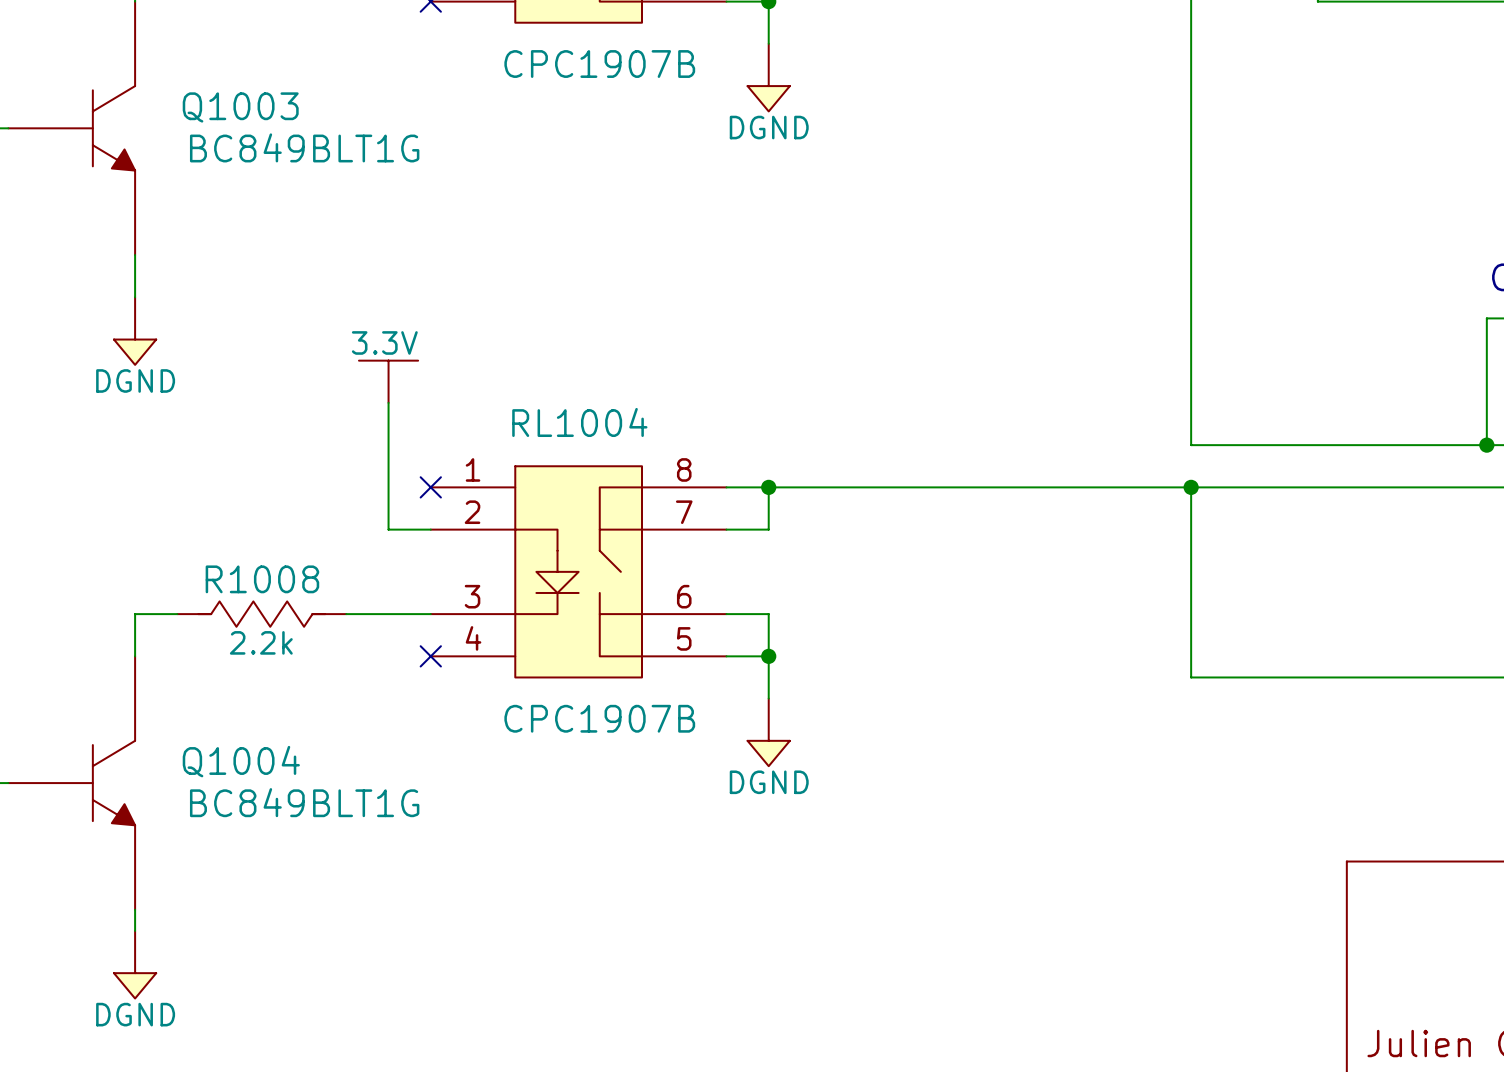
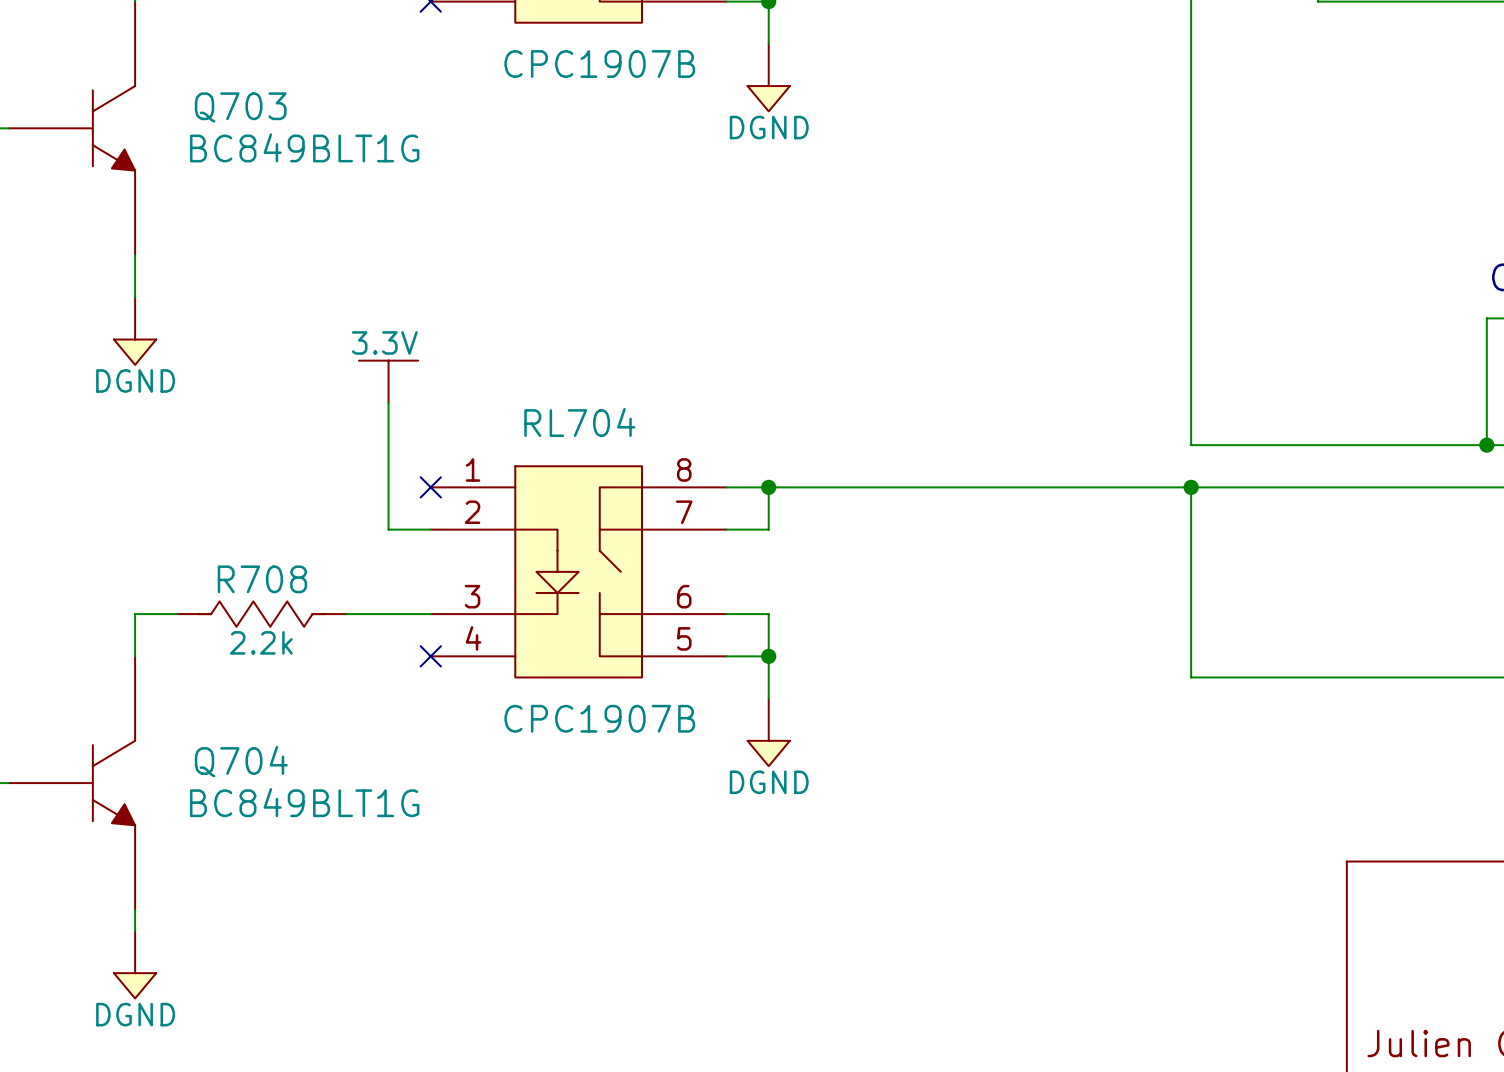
Q1003 name: Q1003 (240, 107) -> Q703 (240, 107)
RL1004 name: RL1004 (579, 422) -> RL704 (579, 422)
R1008 name: R1008 (262, 579) -> R708 (262, 579)
Q1004 name: Q1004 (241, 761) -> Q704 (241, 761)

